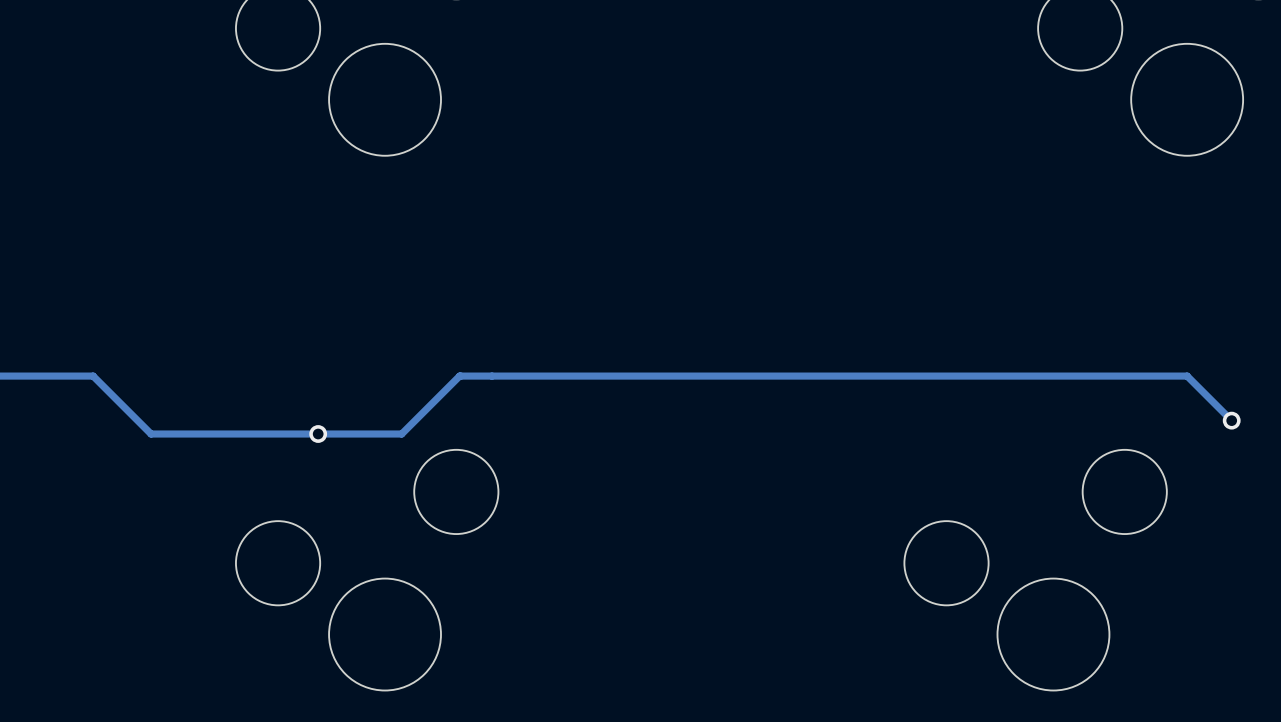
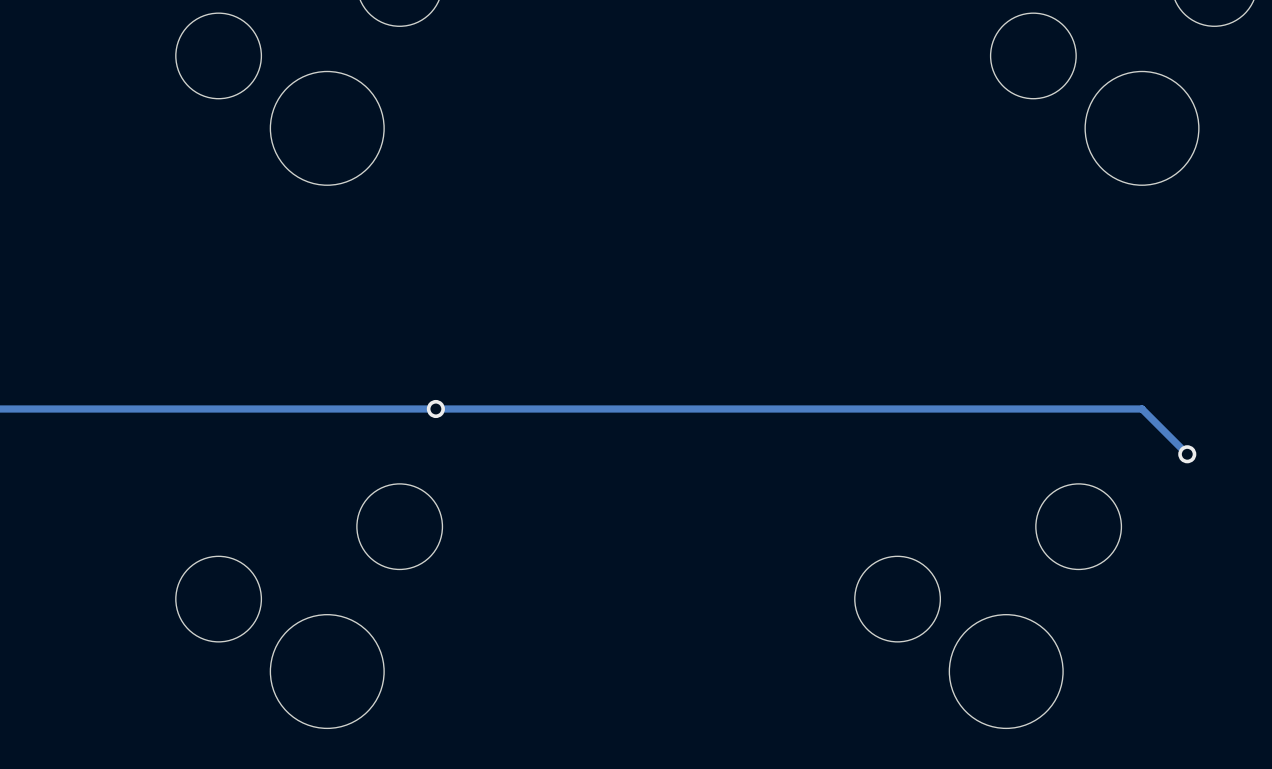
track: (459, 376) (401, 434) (151, 434) (93, 376) -> (403, 408) (30, 408)
via: none -> (435, 408)
via: (318, 434) -> none

